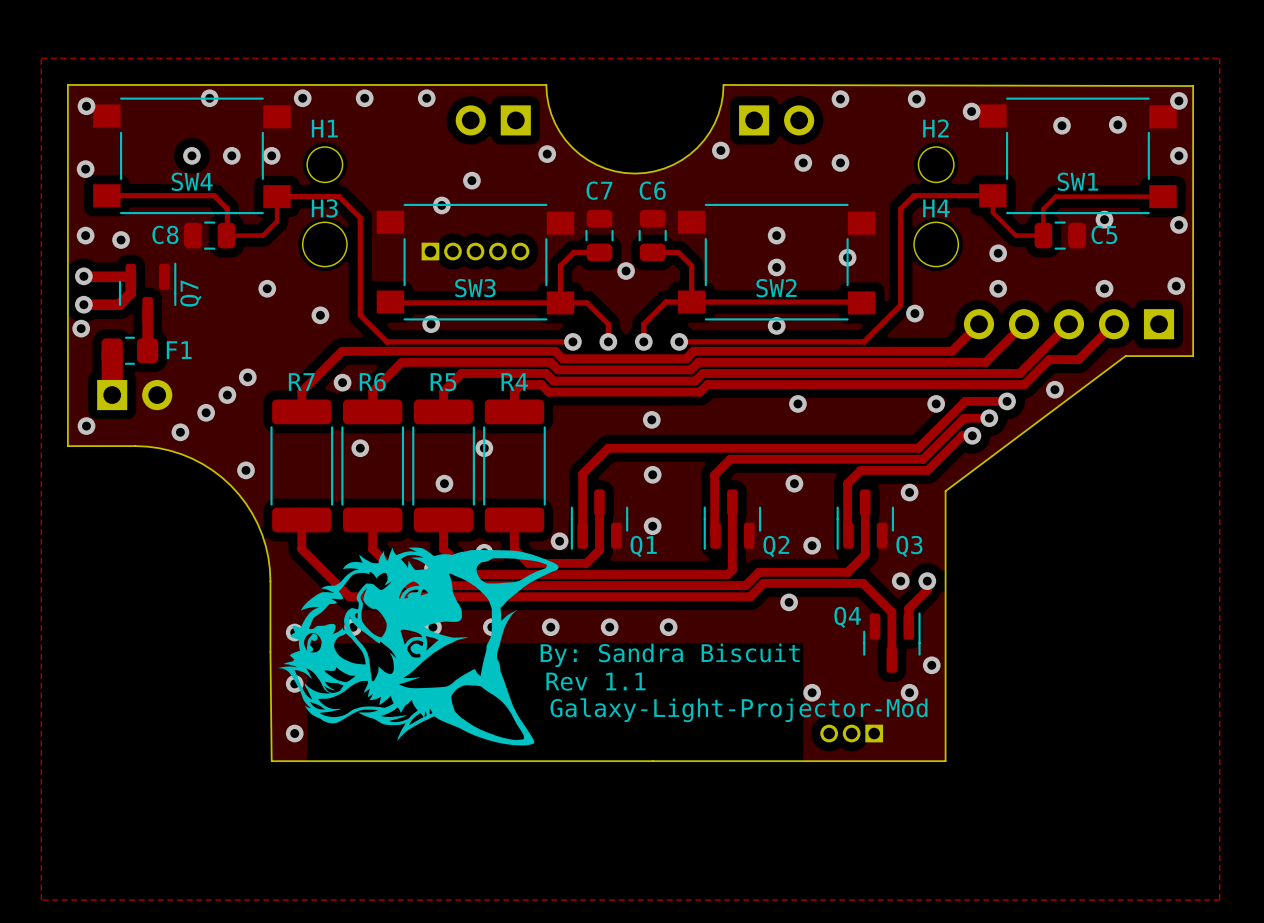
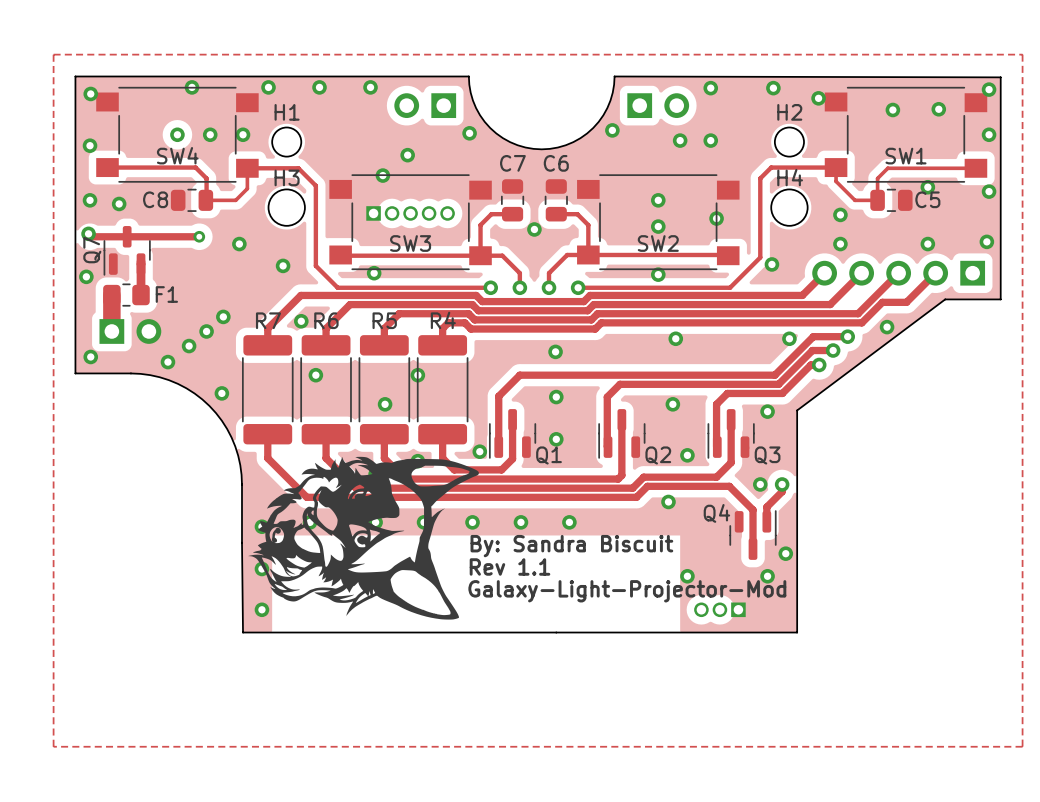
track: (83, 276) (130, 276) (130, 293) (119, 304) (83, 304) -> none
track: none -> (90, 236) (199, 236)
via: none -> (199, 236)
Q7 rotation: 0° (147, 292) -> 180° (127, 250)
via: (83, 304) -> none

